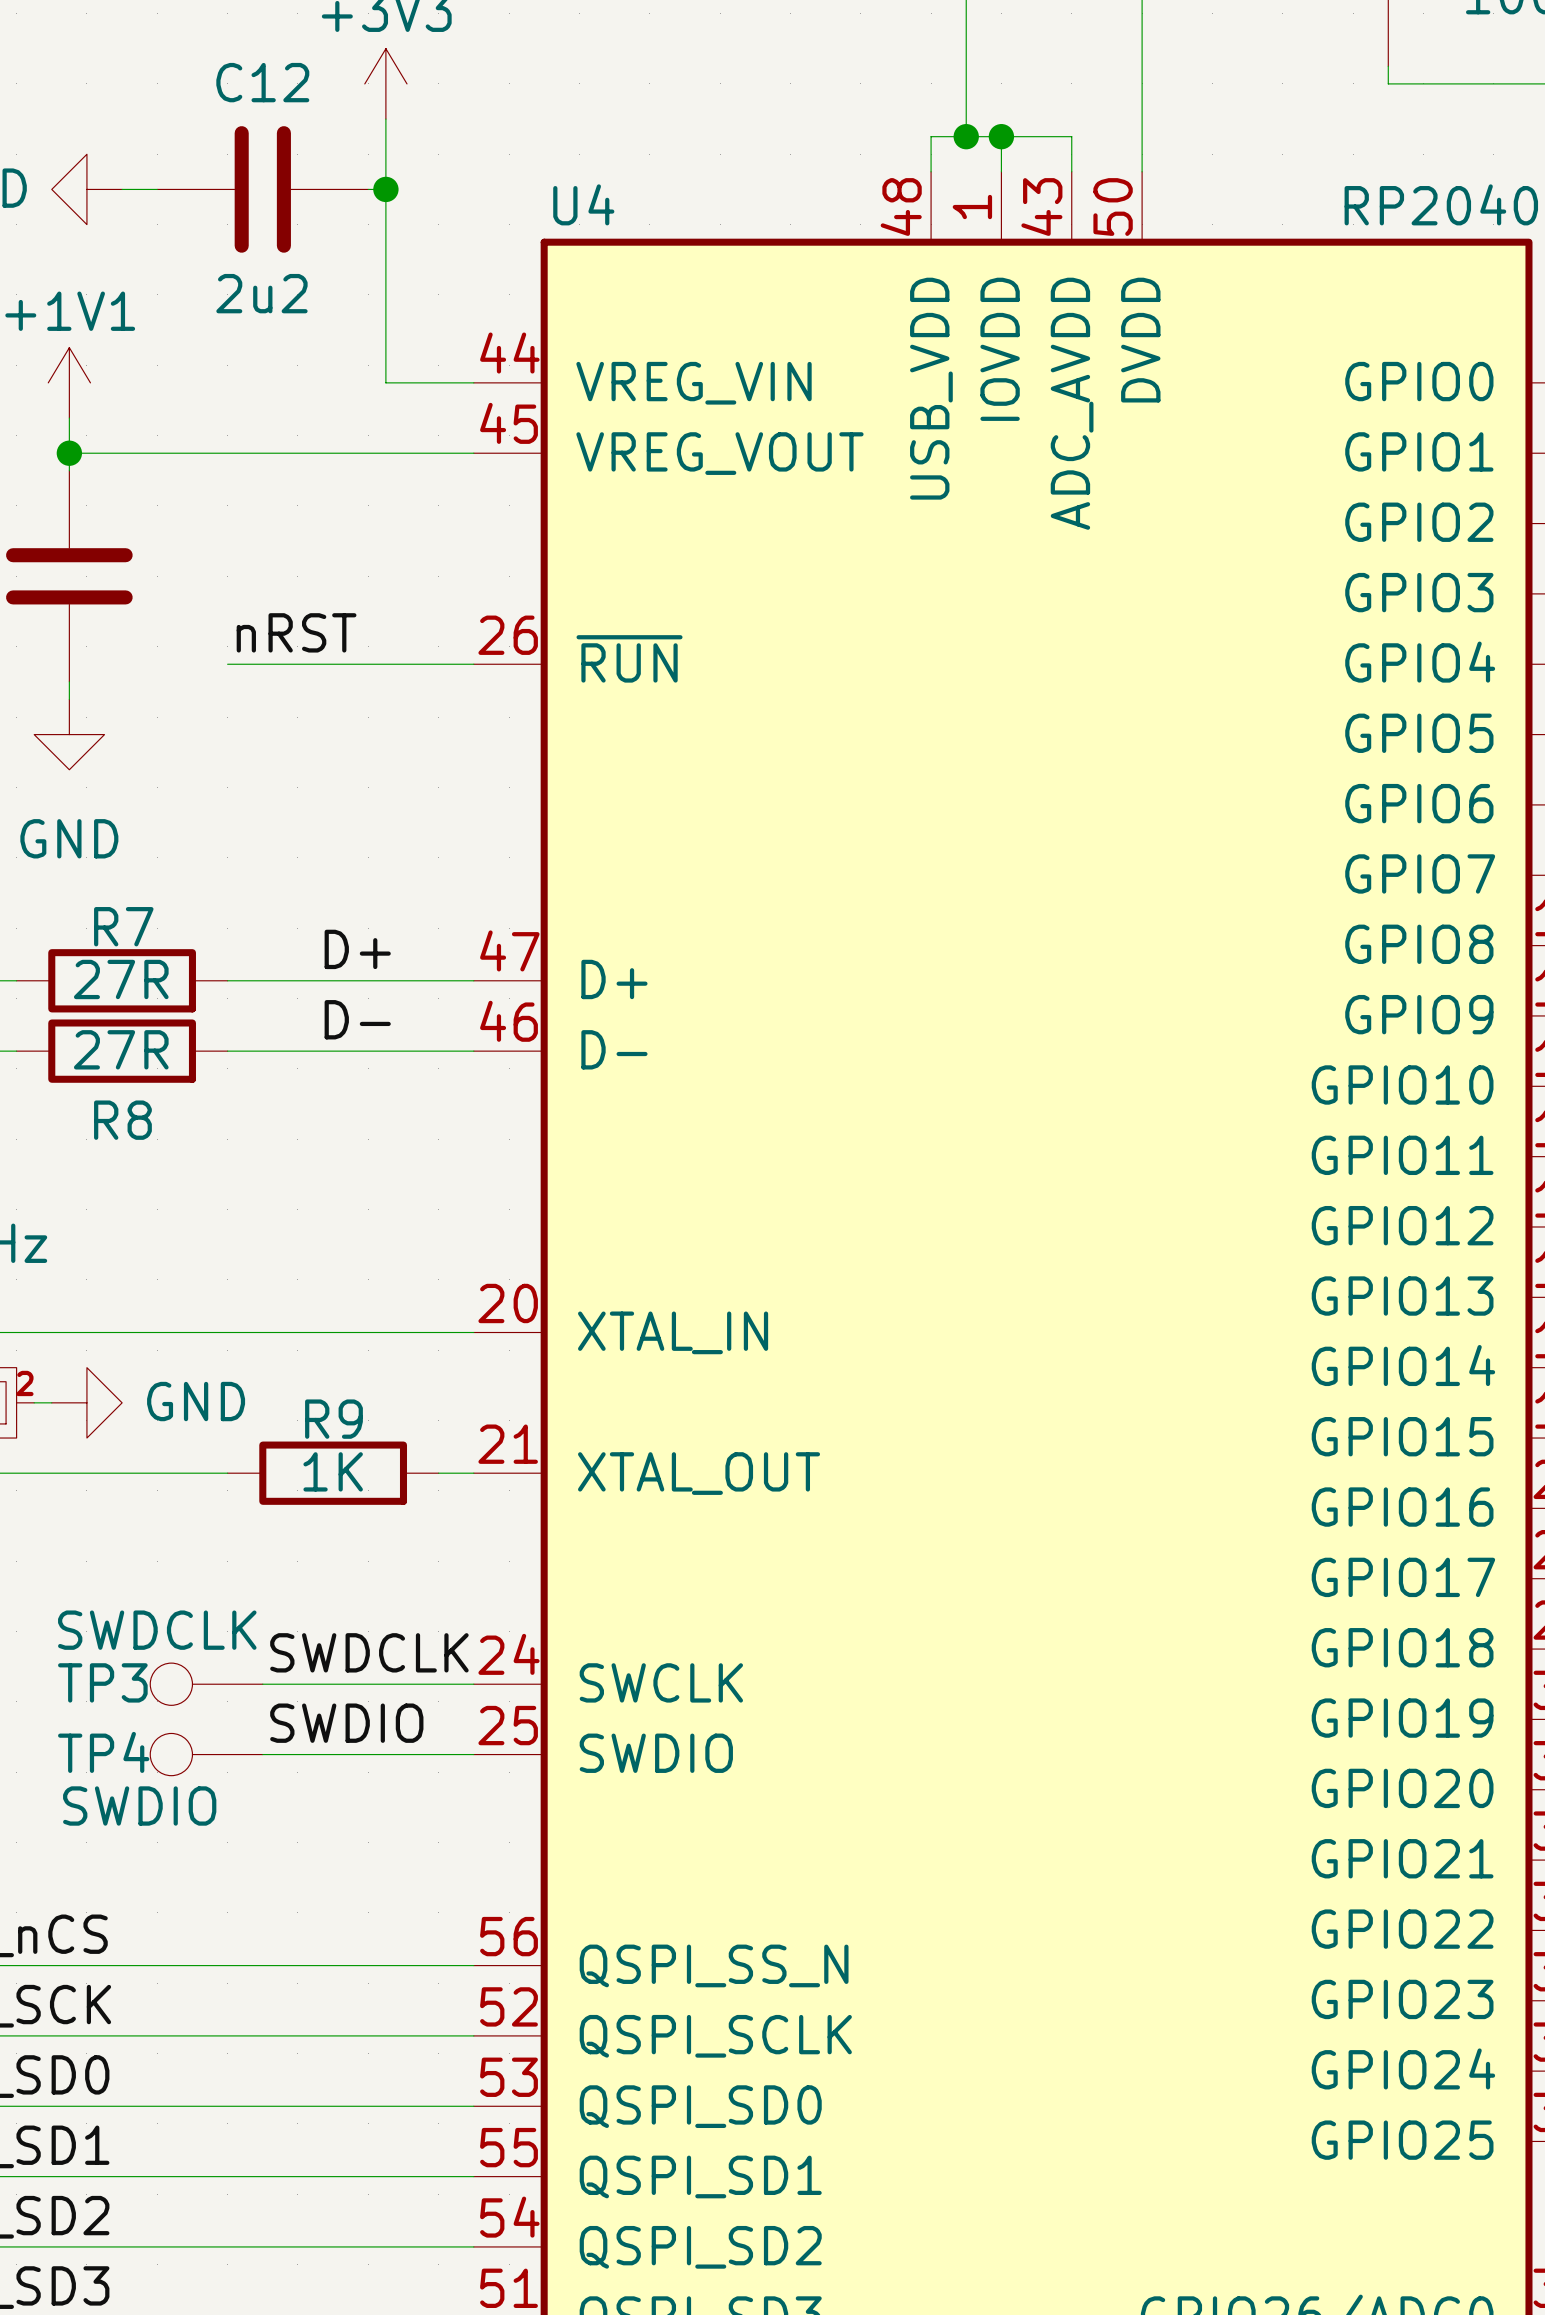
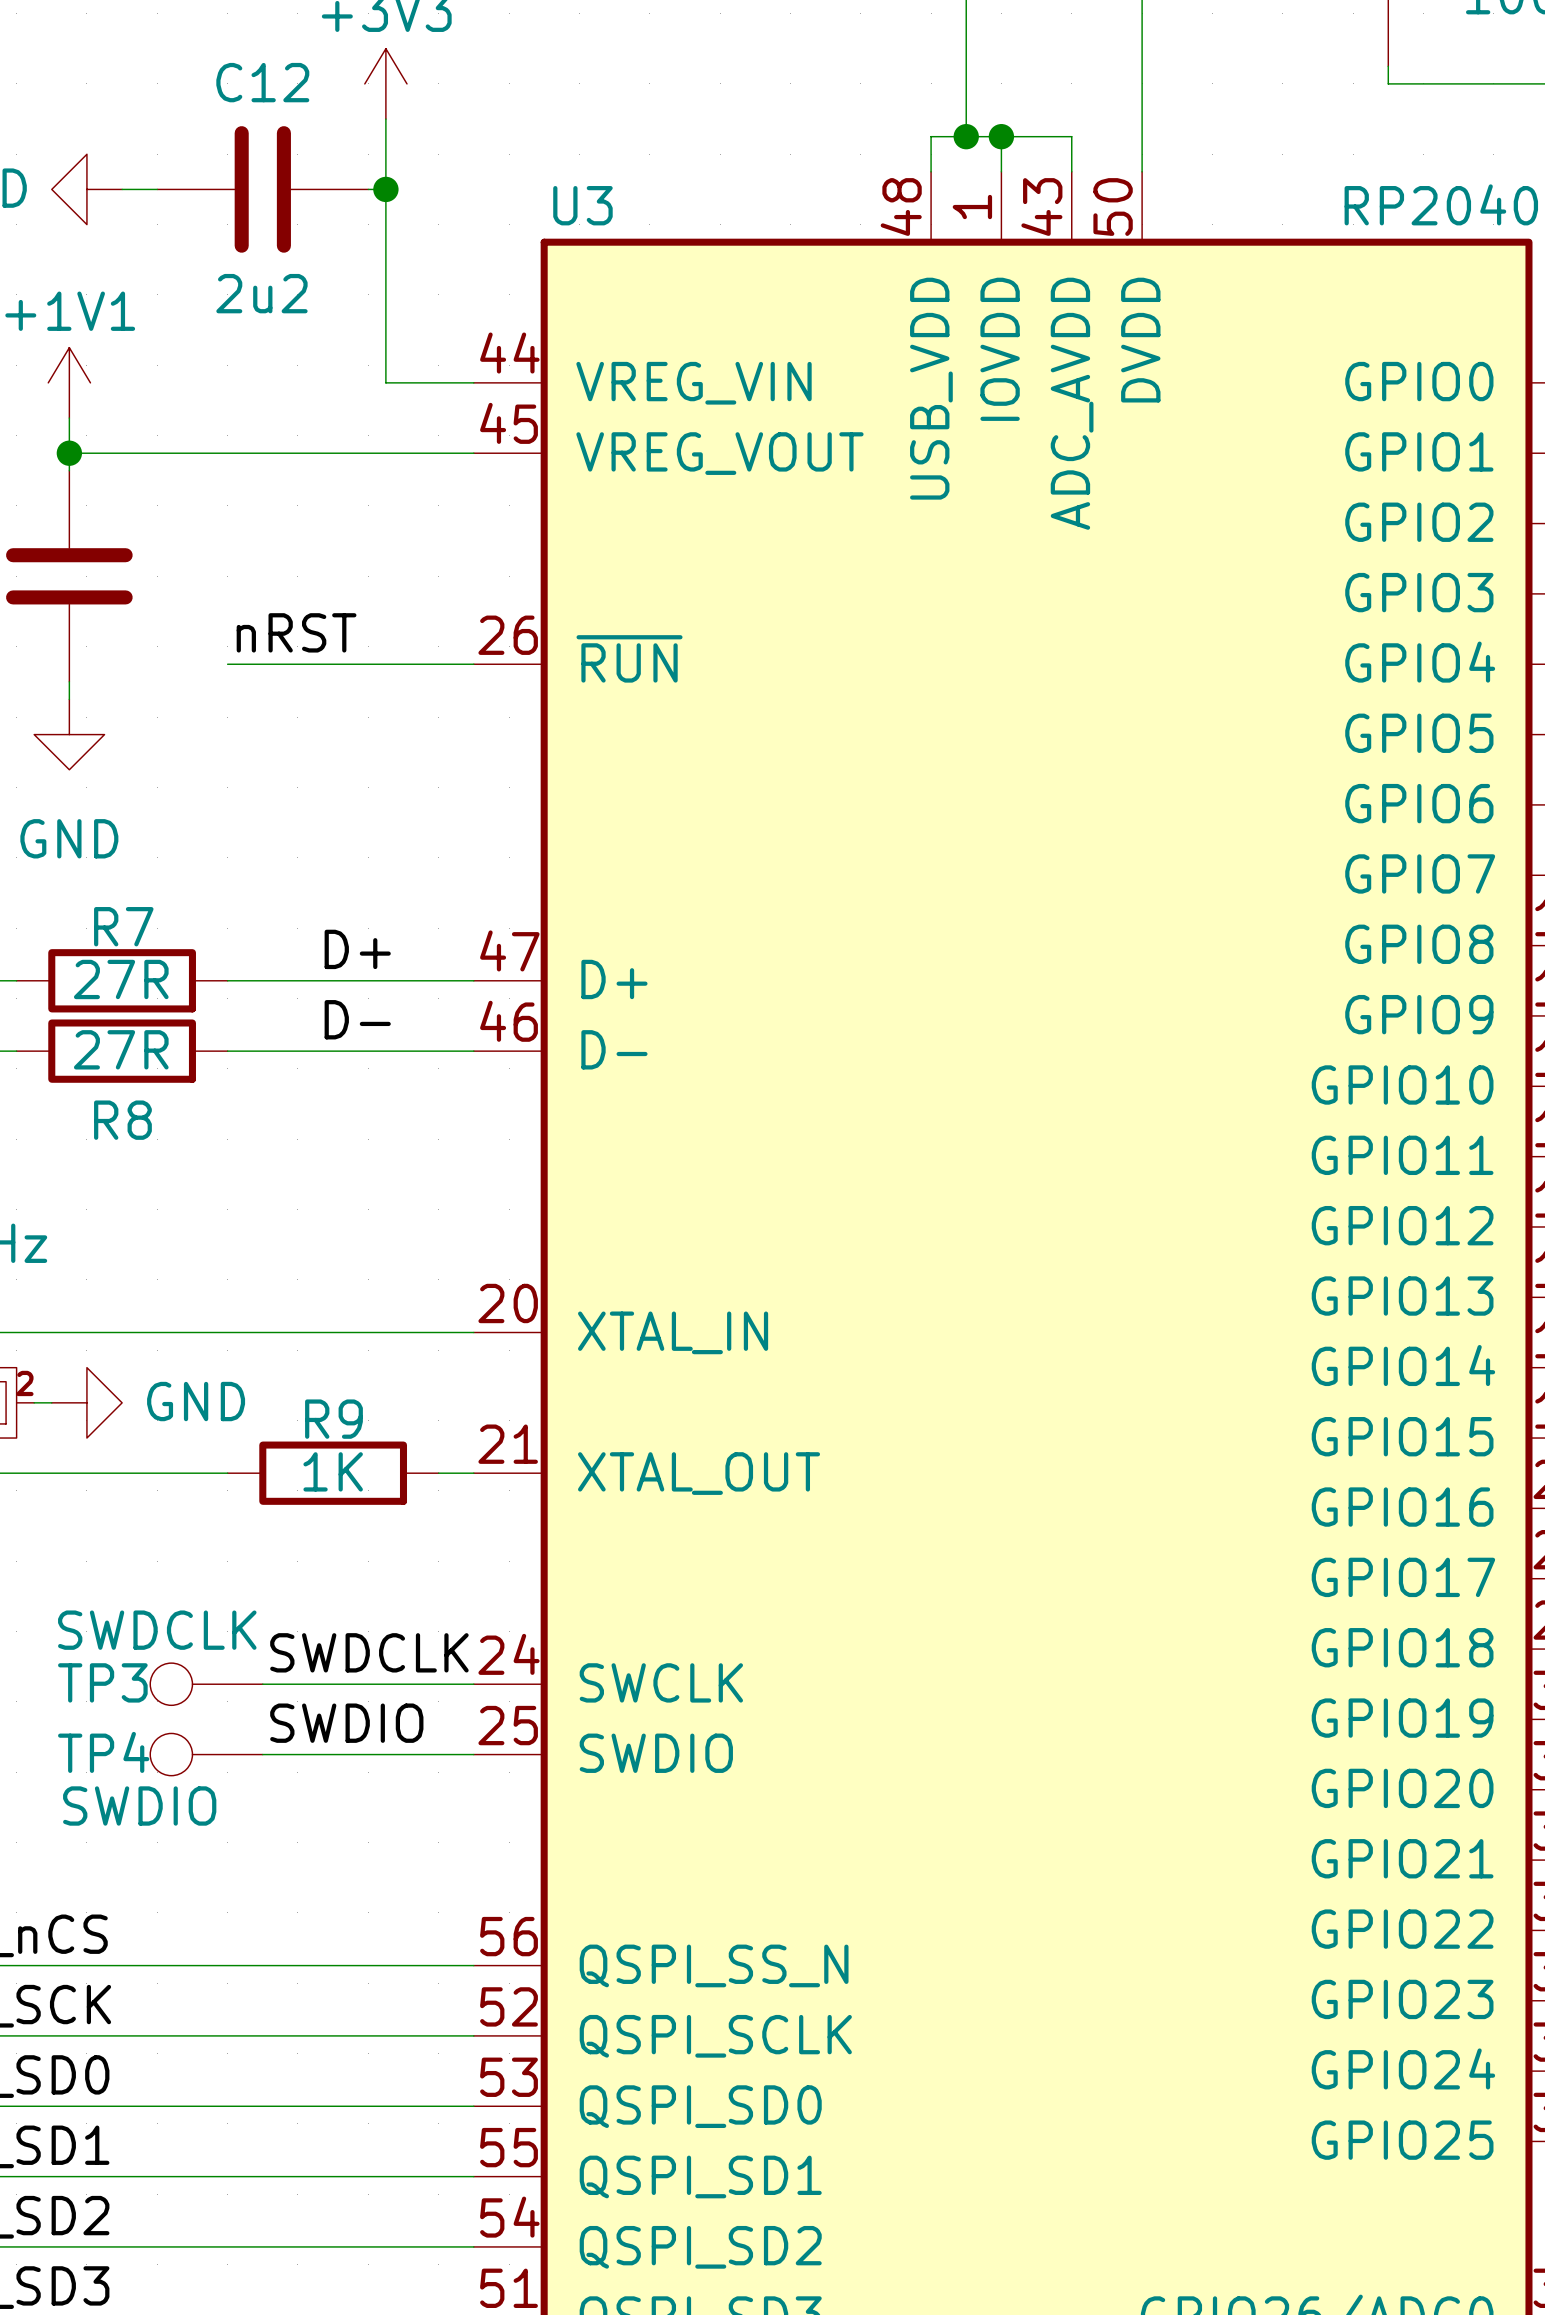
U4 name: U4 (583, 204) -> U3 (582, 205)

